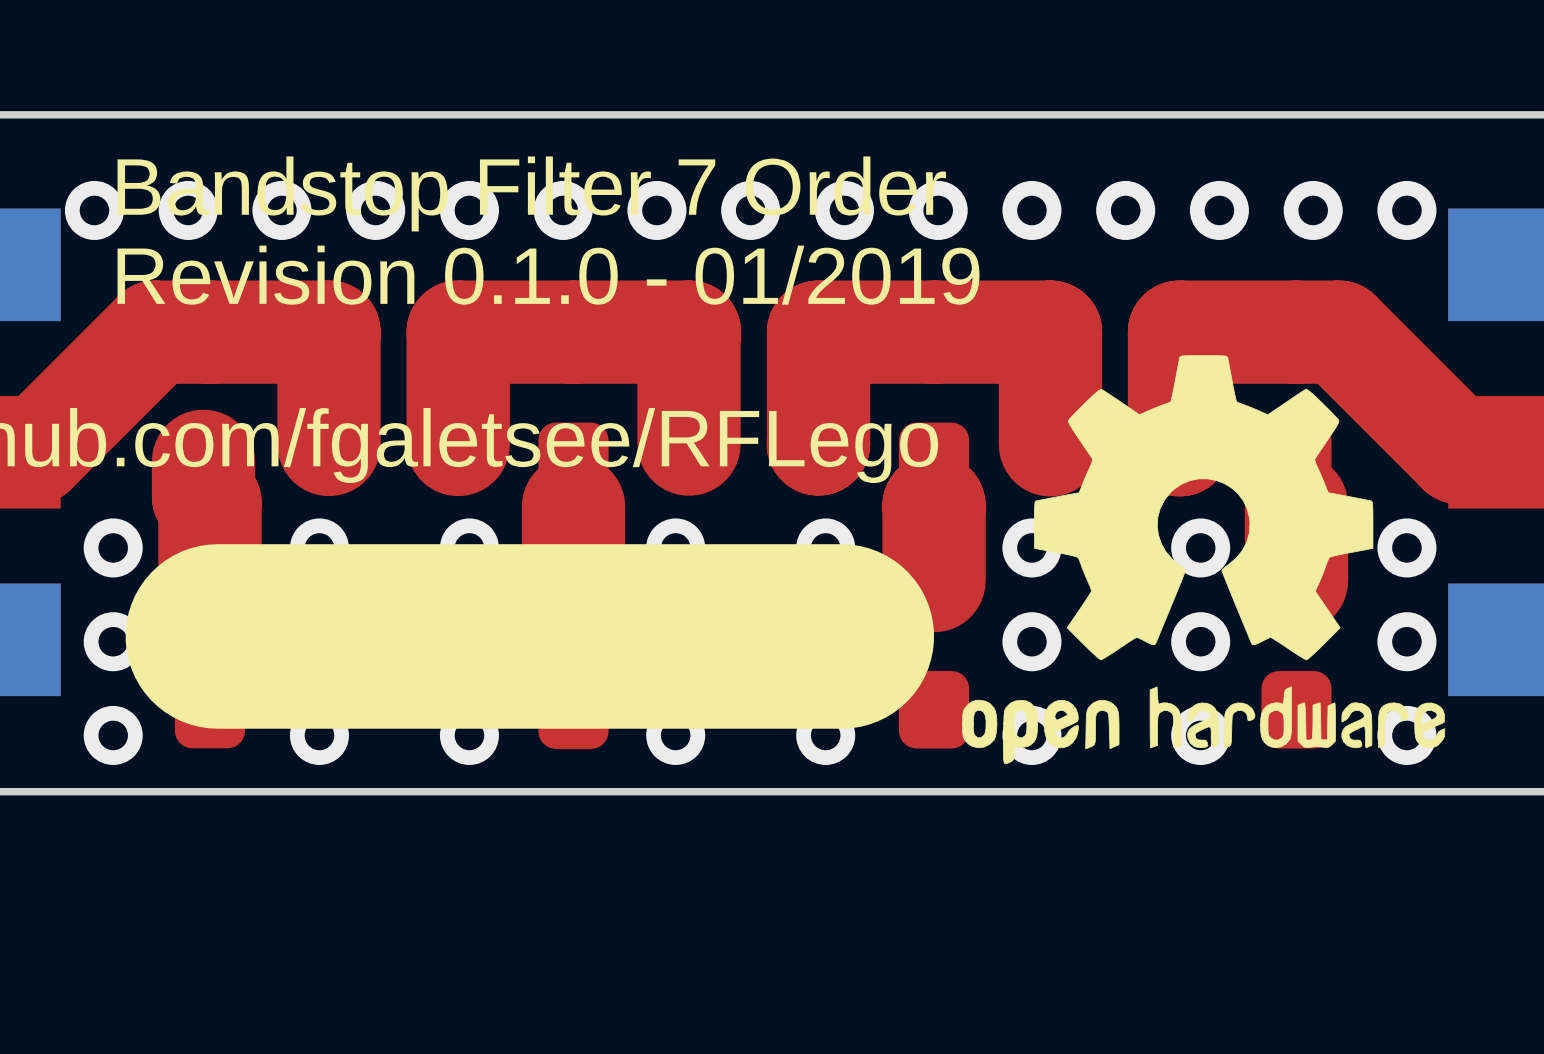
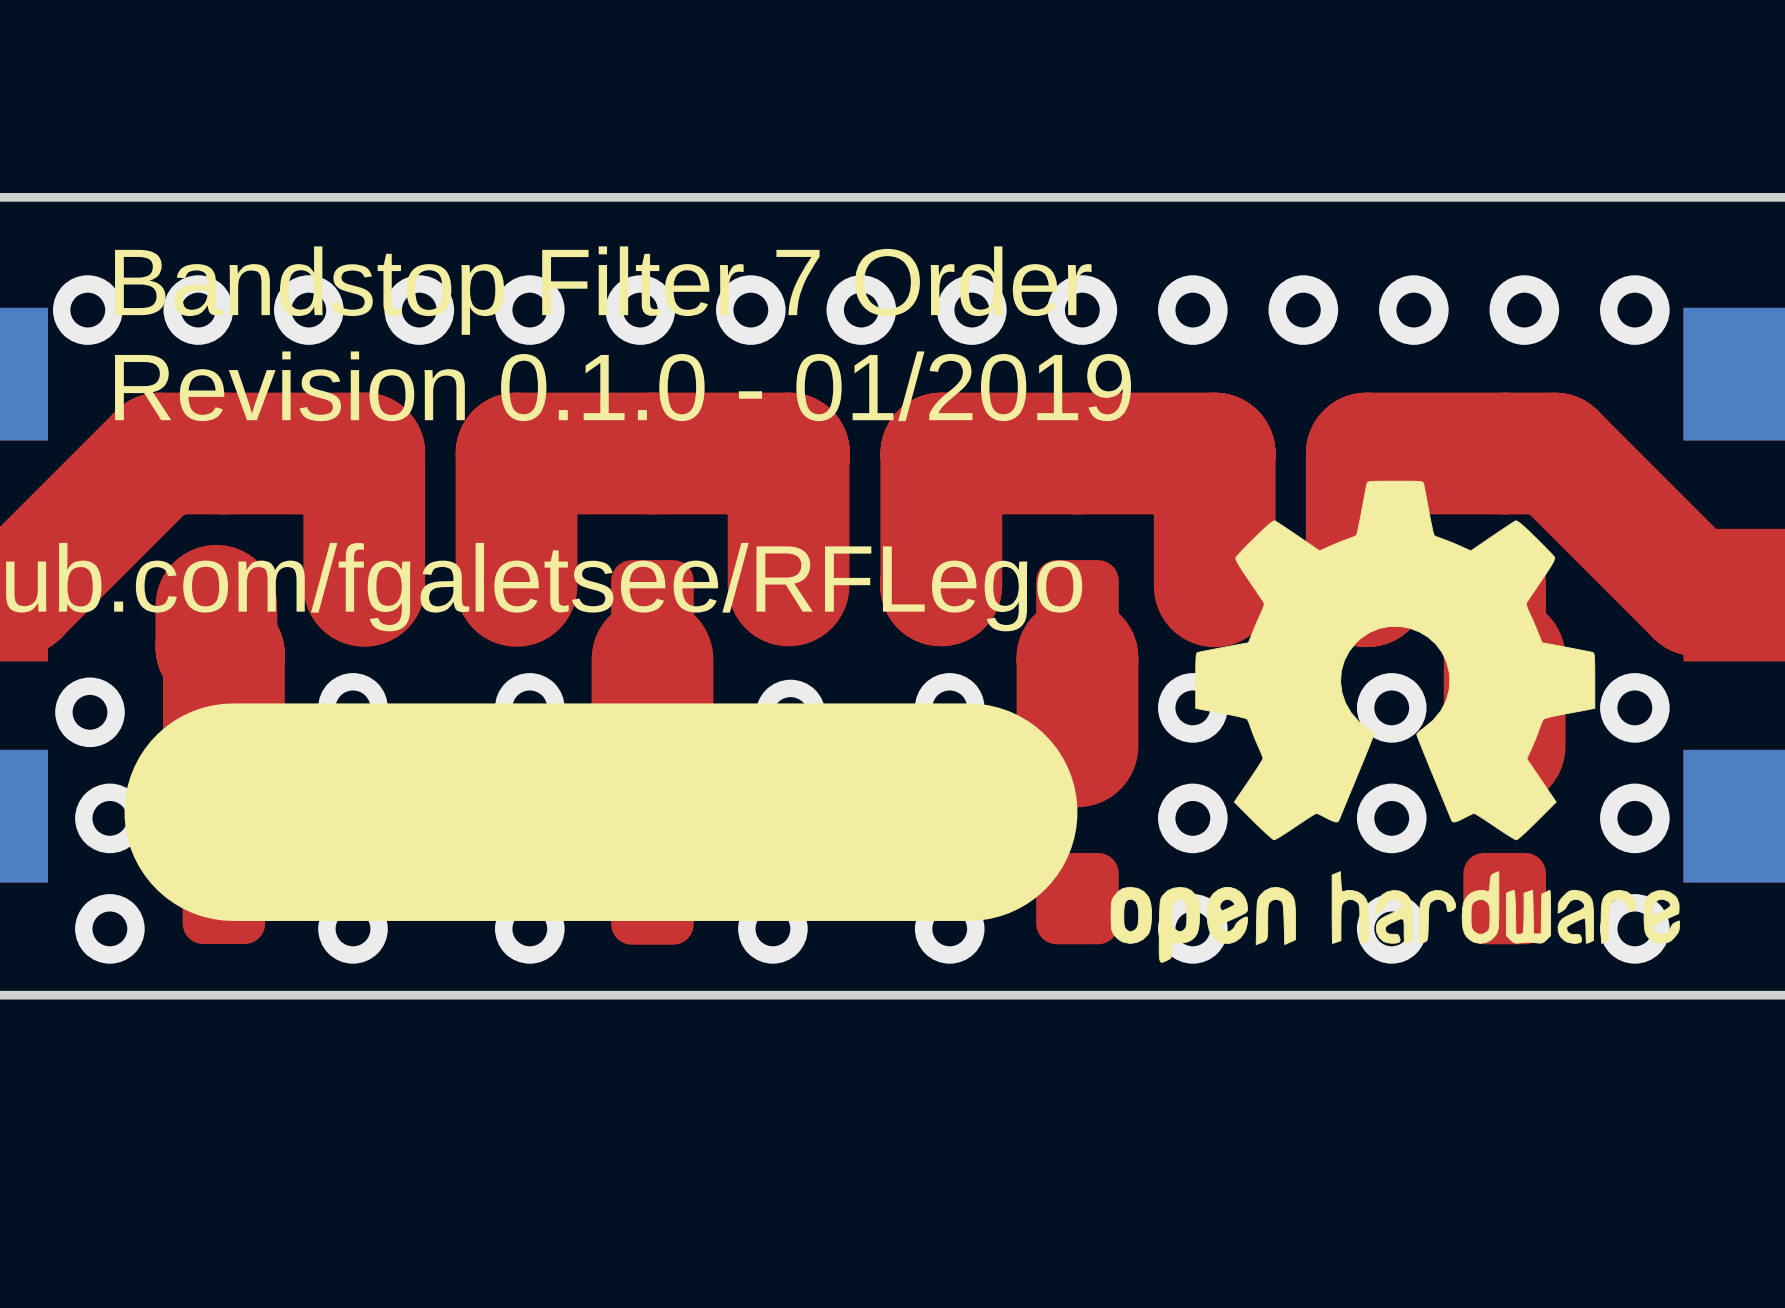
via position: (113, 547) -> (90, 712)
via position: (675, 547) -> (790, 714)

